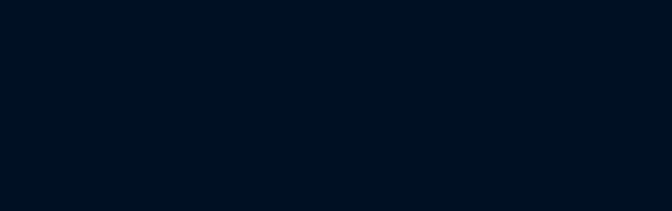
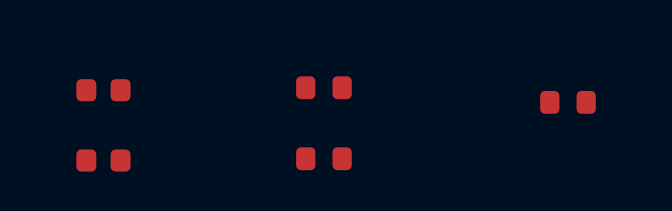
part: none -> (323, 87)
part: none -> (103, 90)
part: none -> (567, 102)
part: none -> (323, 158)
part: none -> (103, 160)

